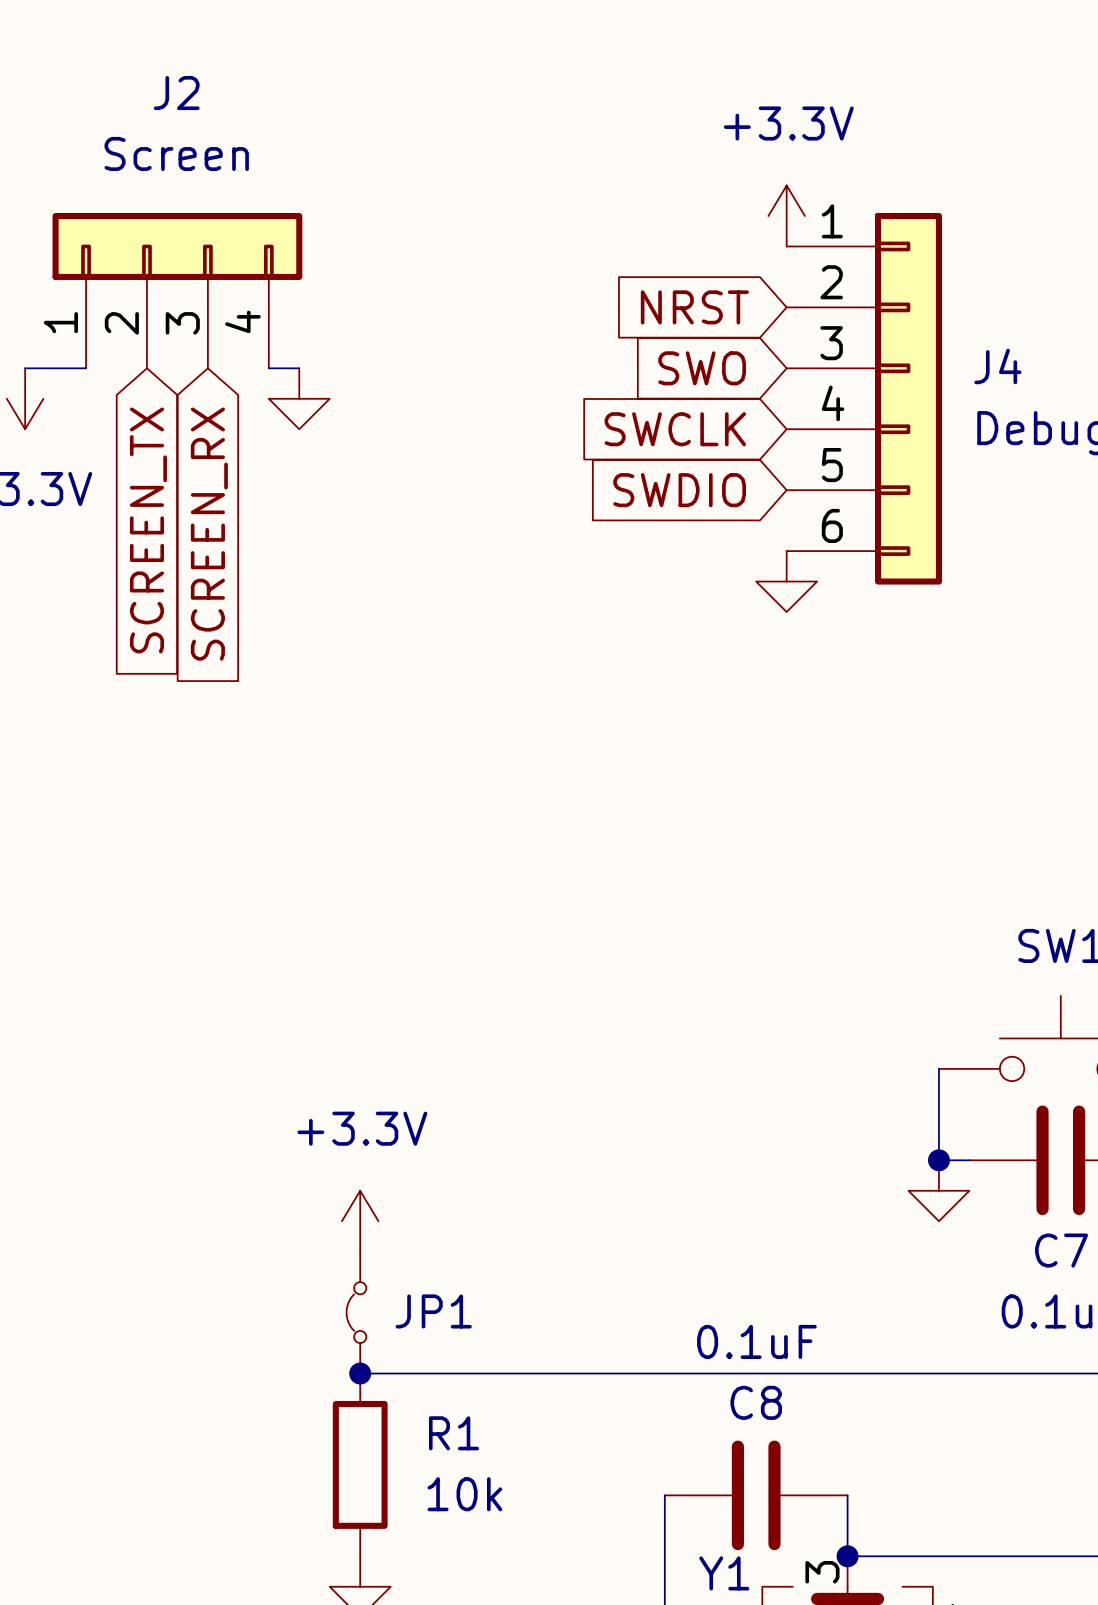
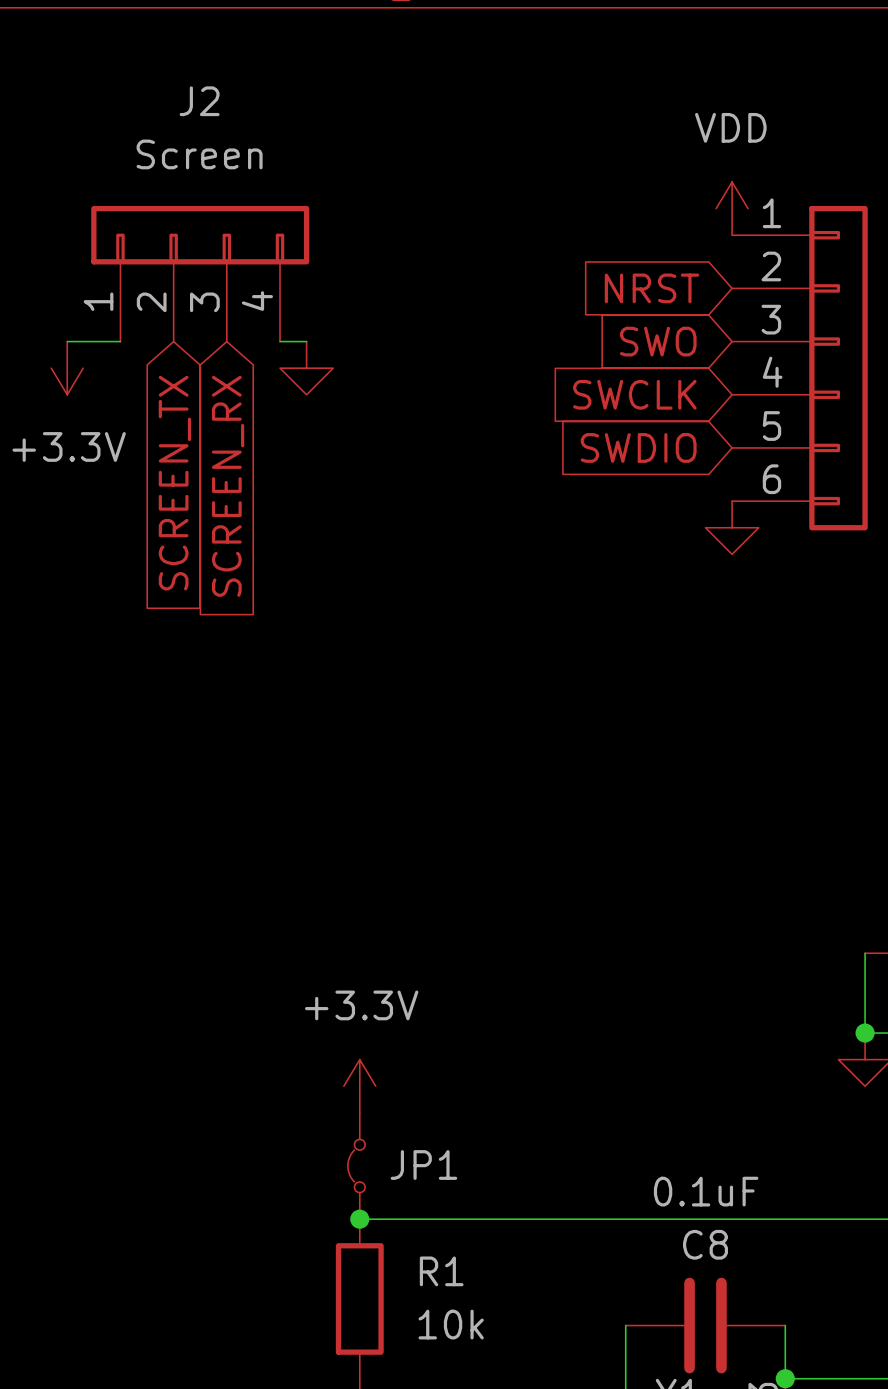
power symbol: +3.3V (786, 216) -> VDD (732, 208)

